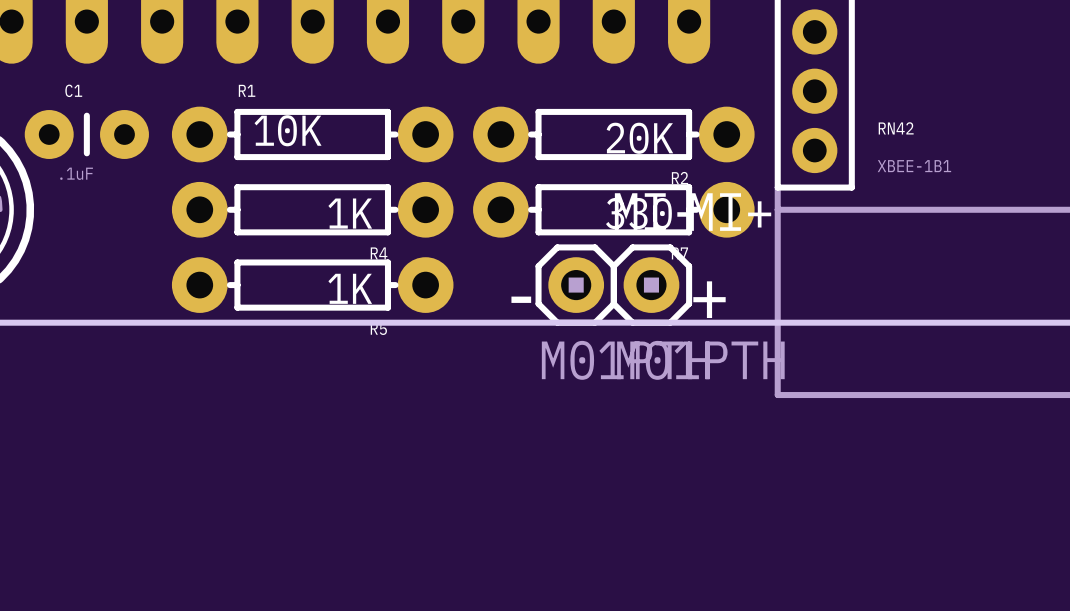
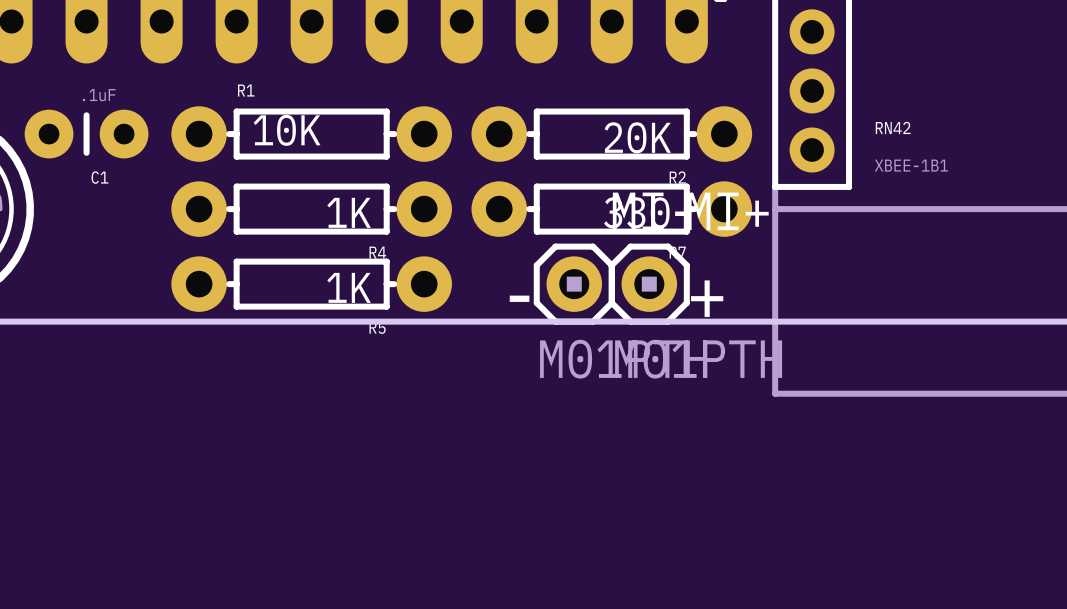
C1 name position: C1 (73, 90) -> C1 (99, 177)
C1 value position: .1uF (76, 173) -> .1uF (99, 95)

